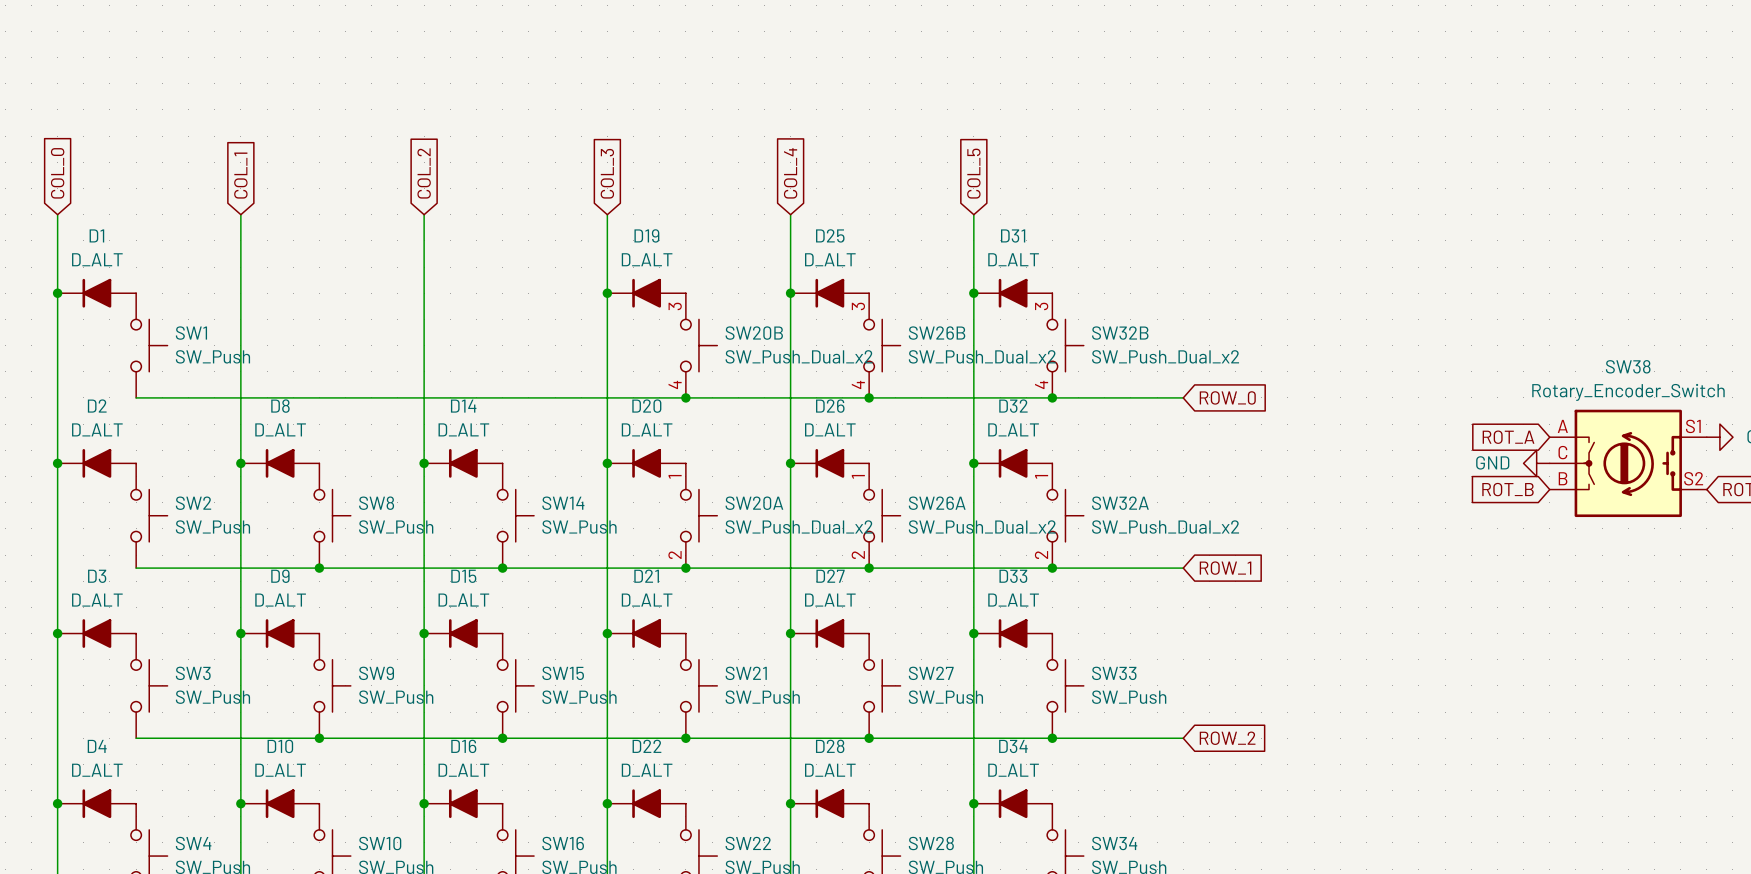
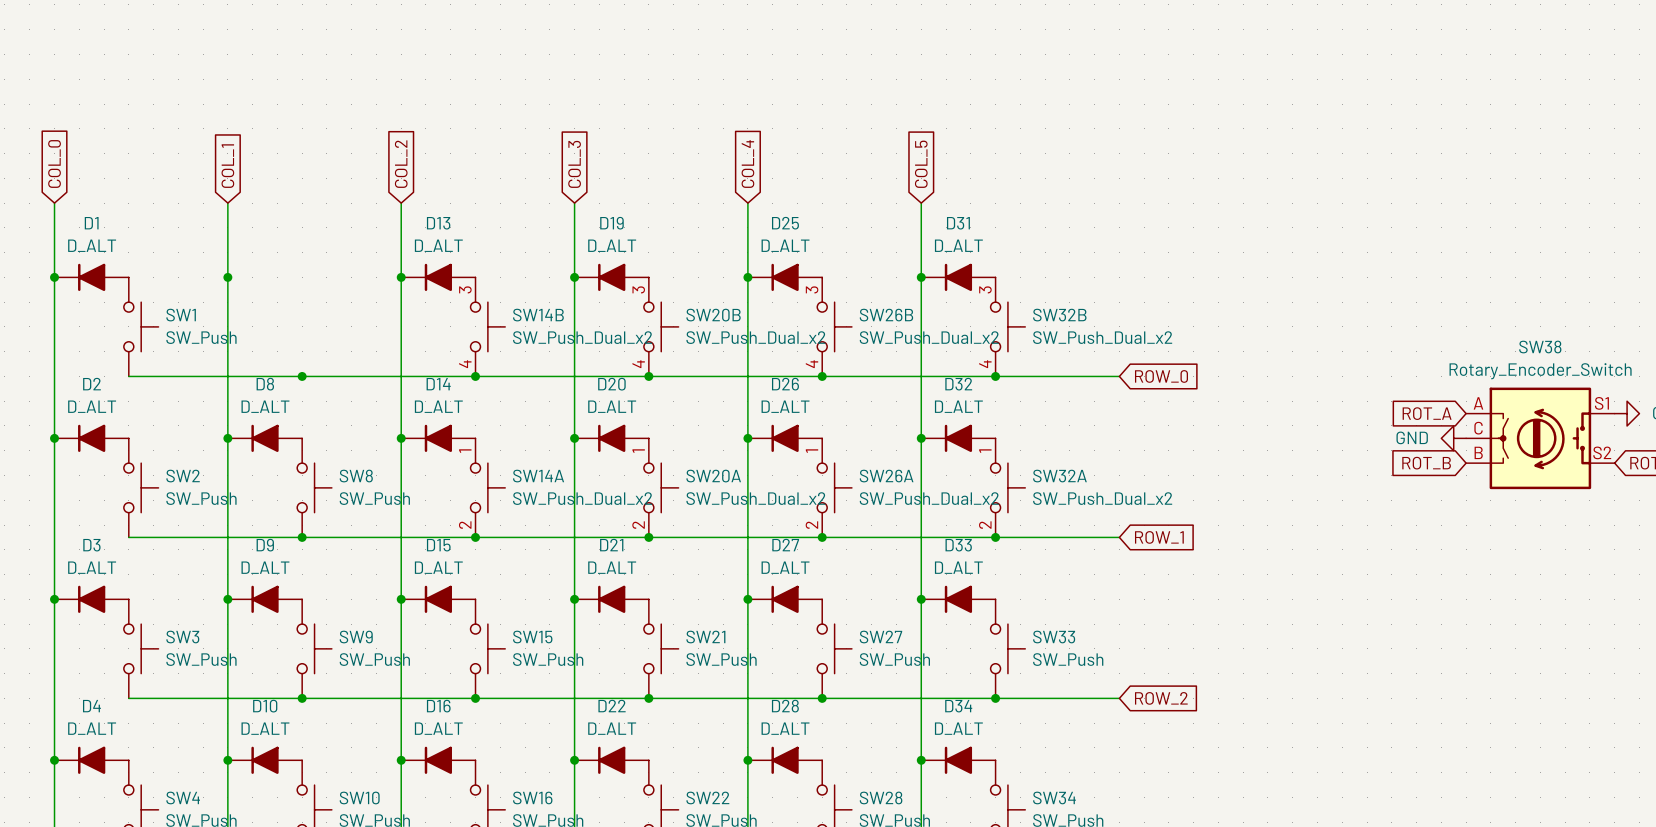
junction: none -> (227, 277)
junction: none -> (401, 277)
D13: none -> D_ALT (438, 277)
SW14B: none -> SW_Push_Dual_x2 (487, 326)
junction: none -> (302, 376)
junction: none -> (475, 376)
SW14 pin number: none -> 1 (465, 451)
SW14 name: SW14 (563, 503) -> SW14A (538, 476)
SW14 value: SW_Push (579, 527) -> SW_Push_Dual_x2 (582, 498)
SW14 pin number: none -> 2 (465, 525)

